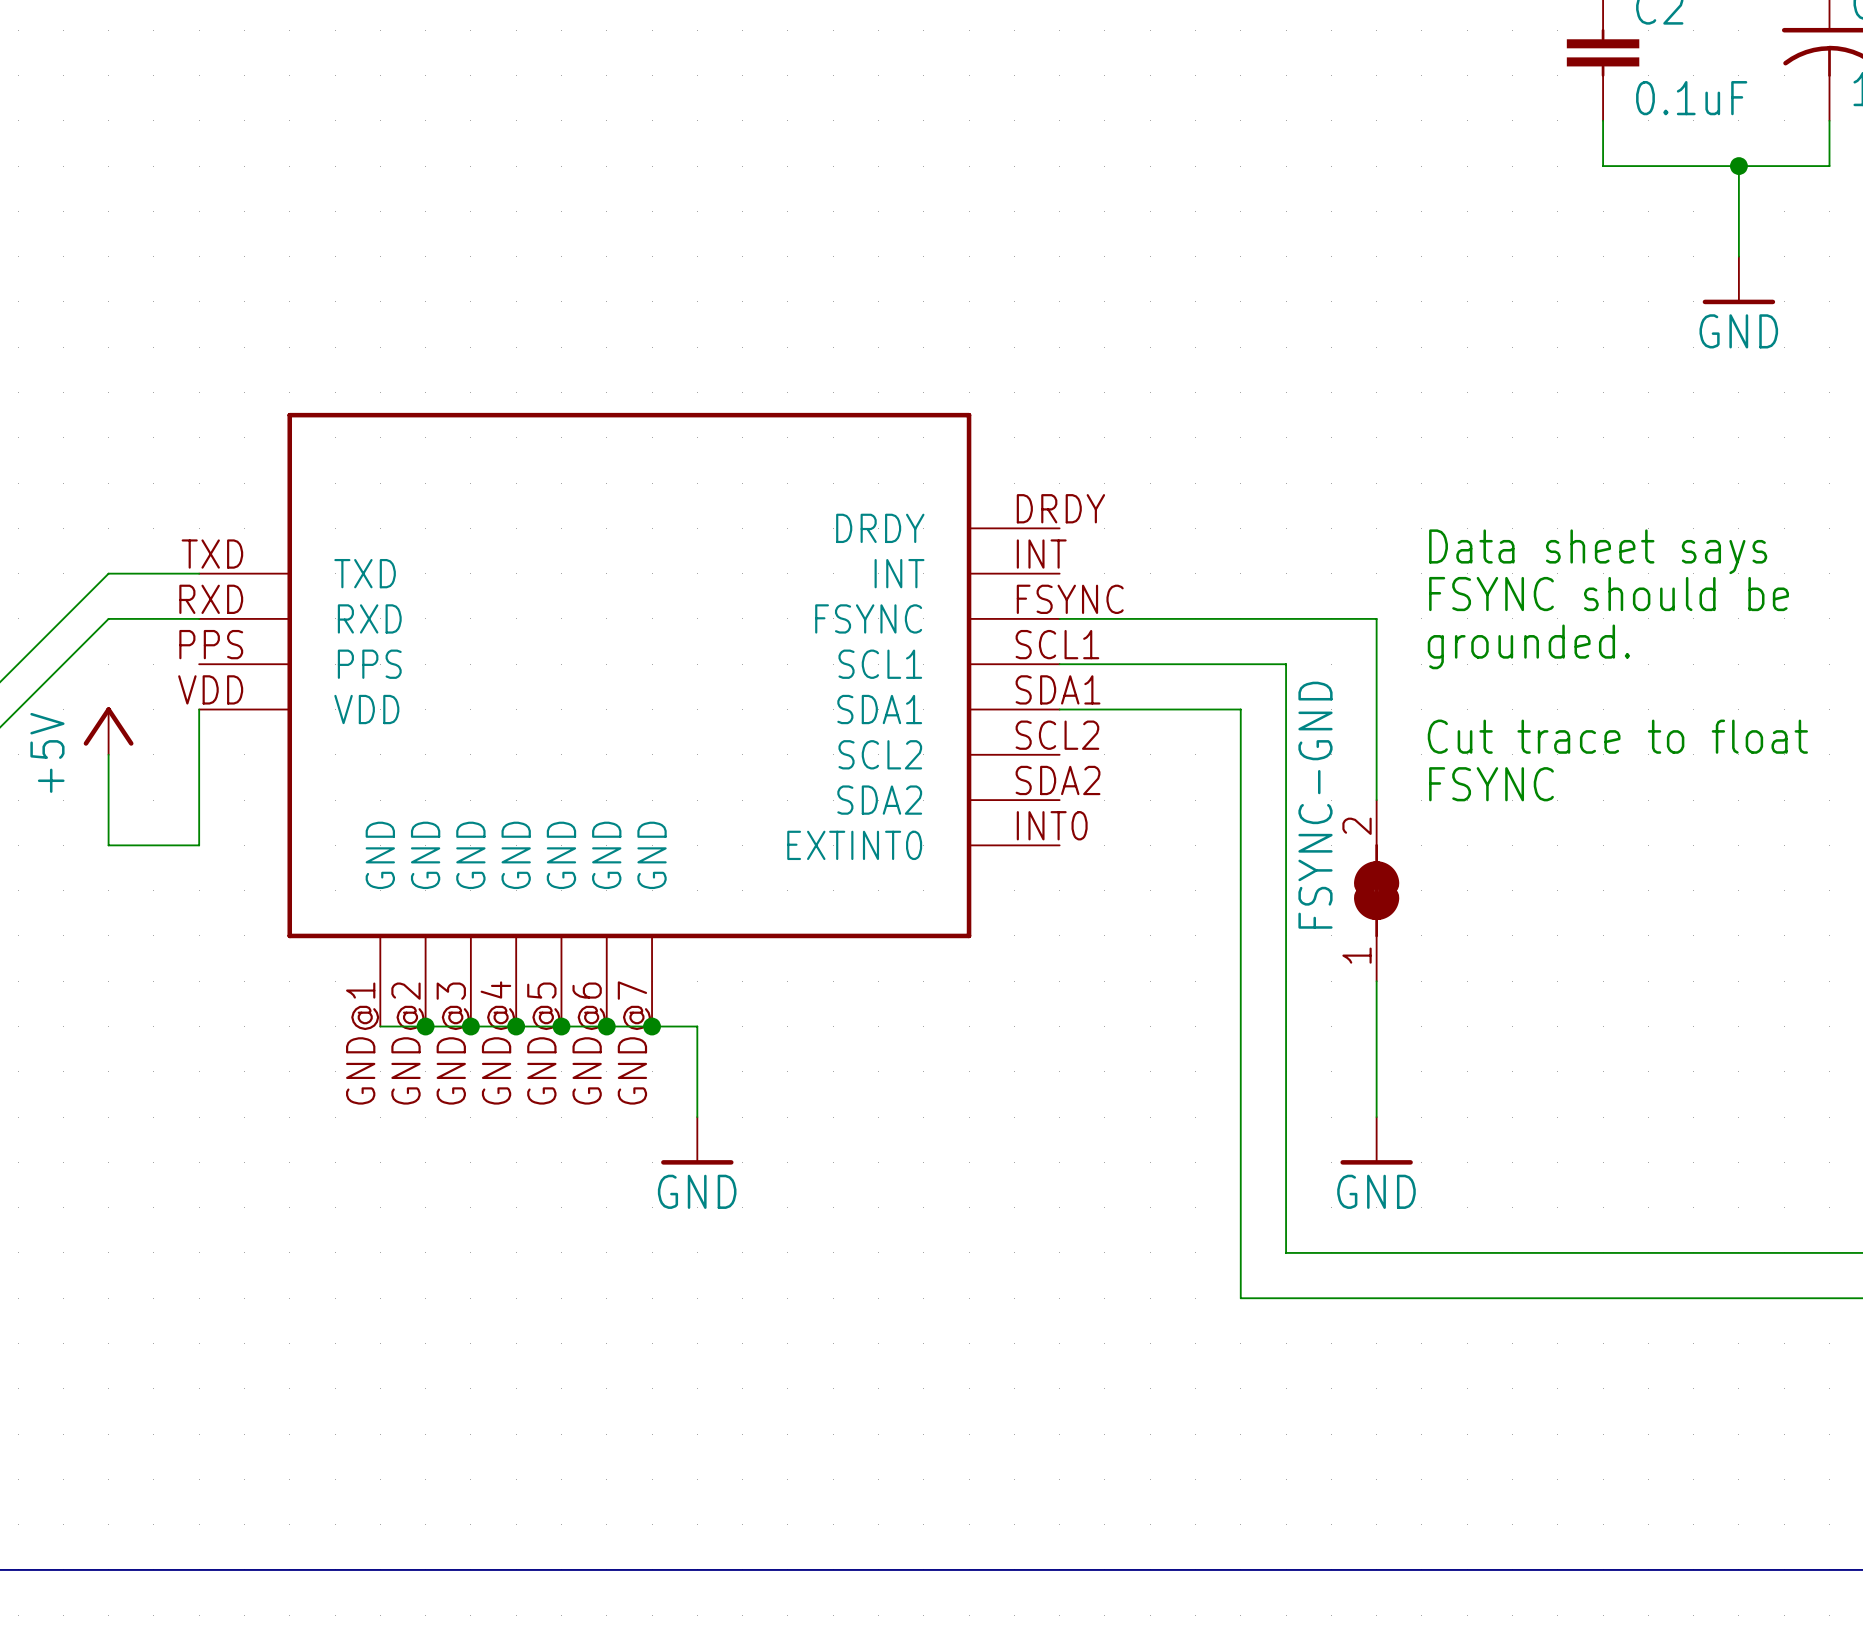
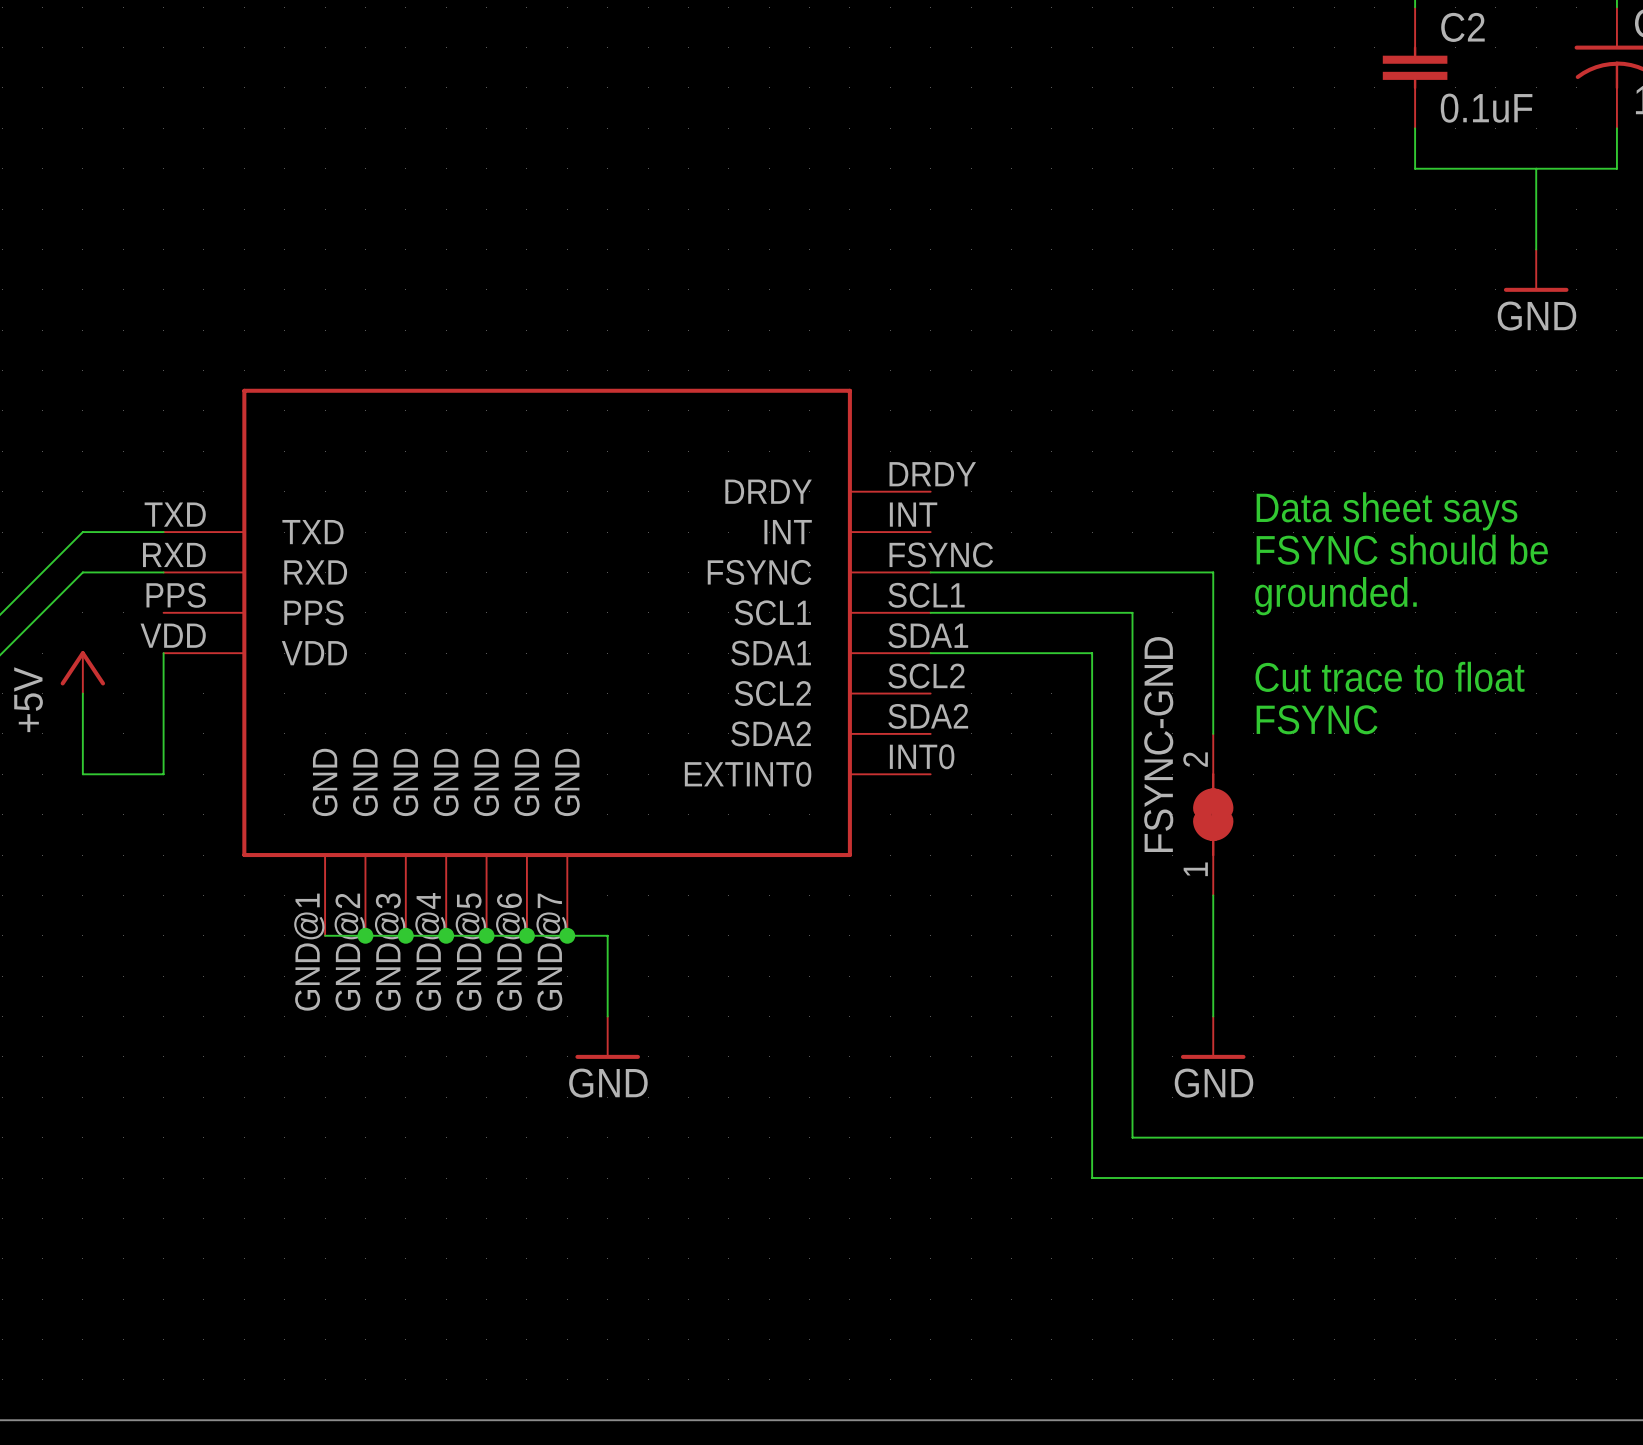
junction: (1738, 166) -> none

